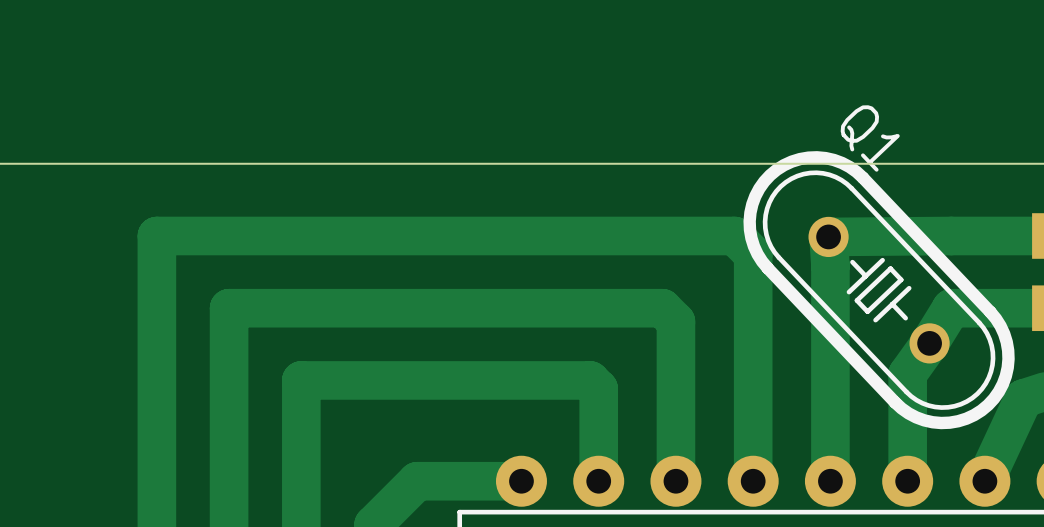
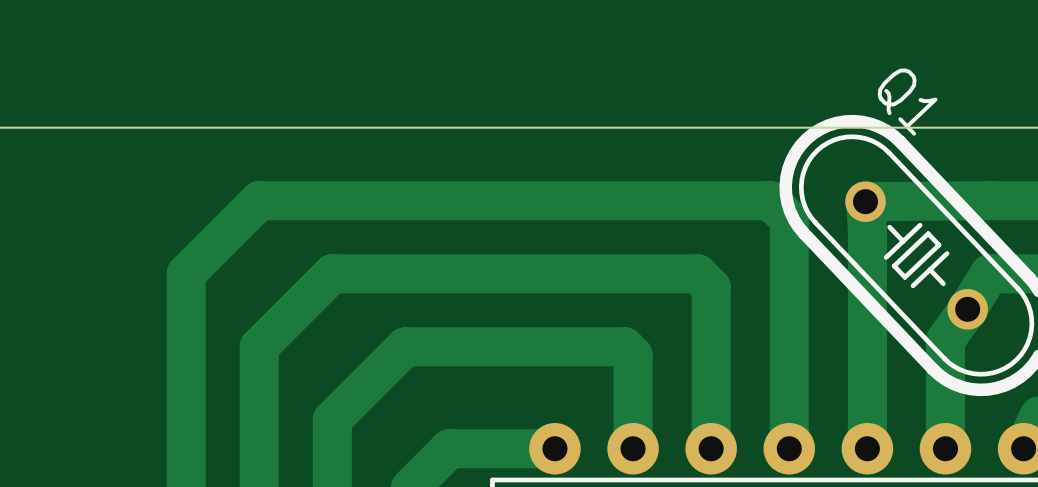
track: (229, 235) (156, 235) (156, 308) -> (259, 200) (186, 273)
track: (301, 308) (229, 308) (229, 380) -> (332, 273) (259, 346)
track: (373, 380) (301, 380) (301, 452) -> (405, 346) (332, 419)

